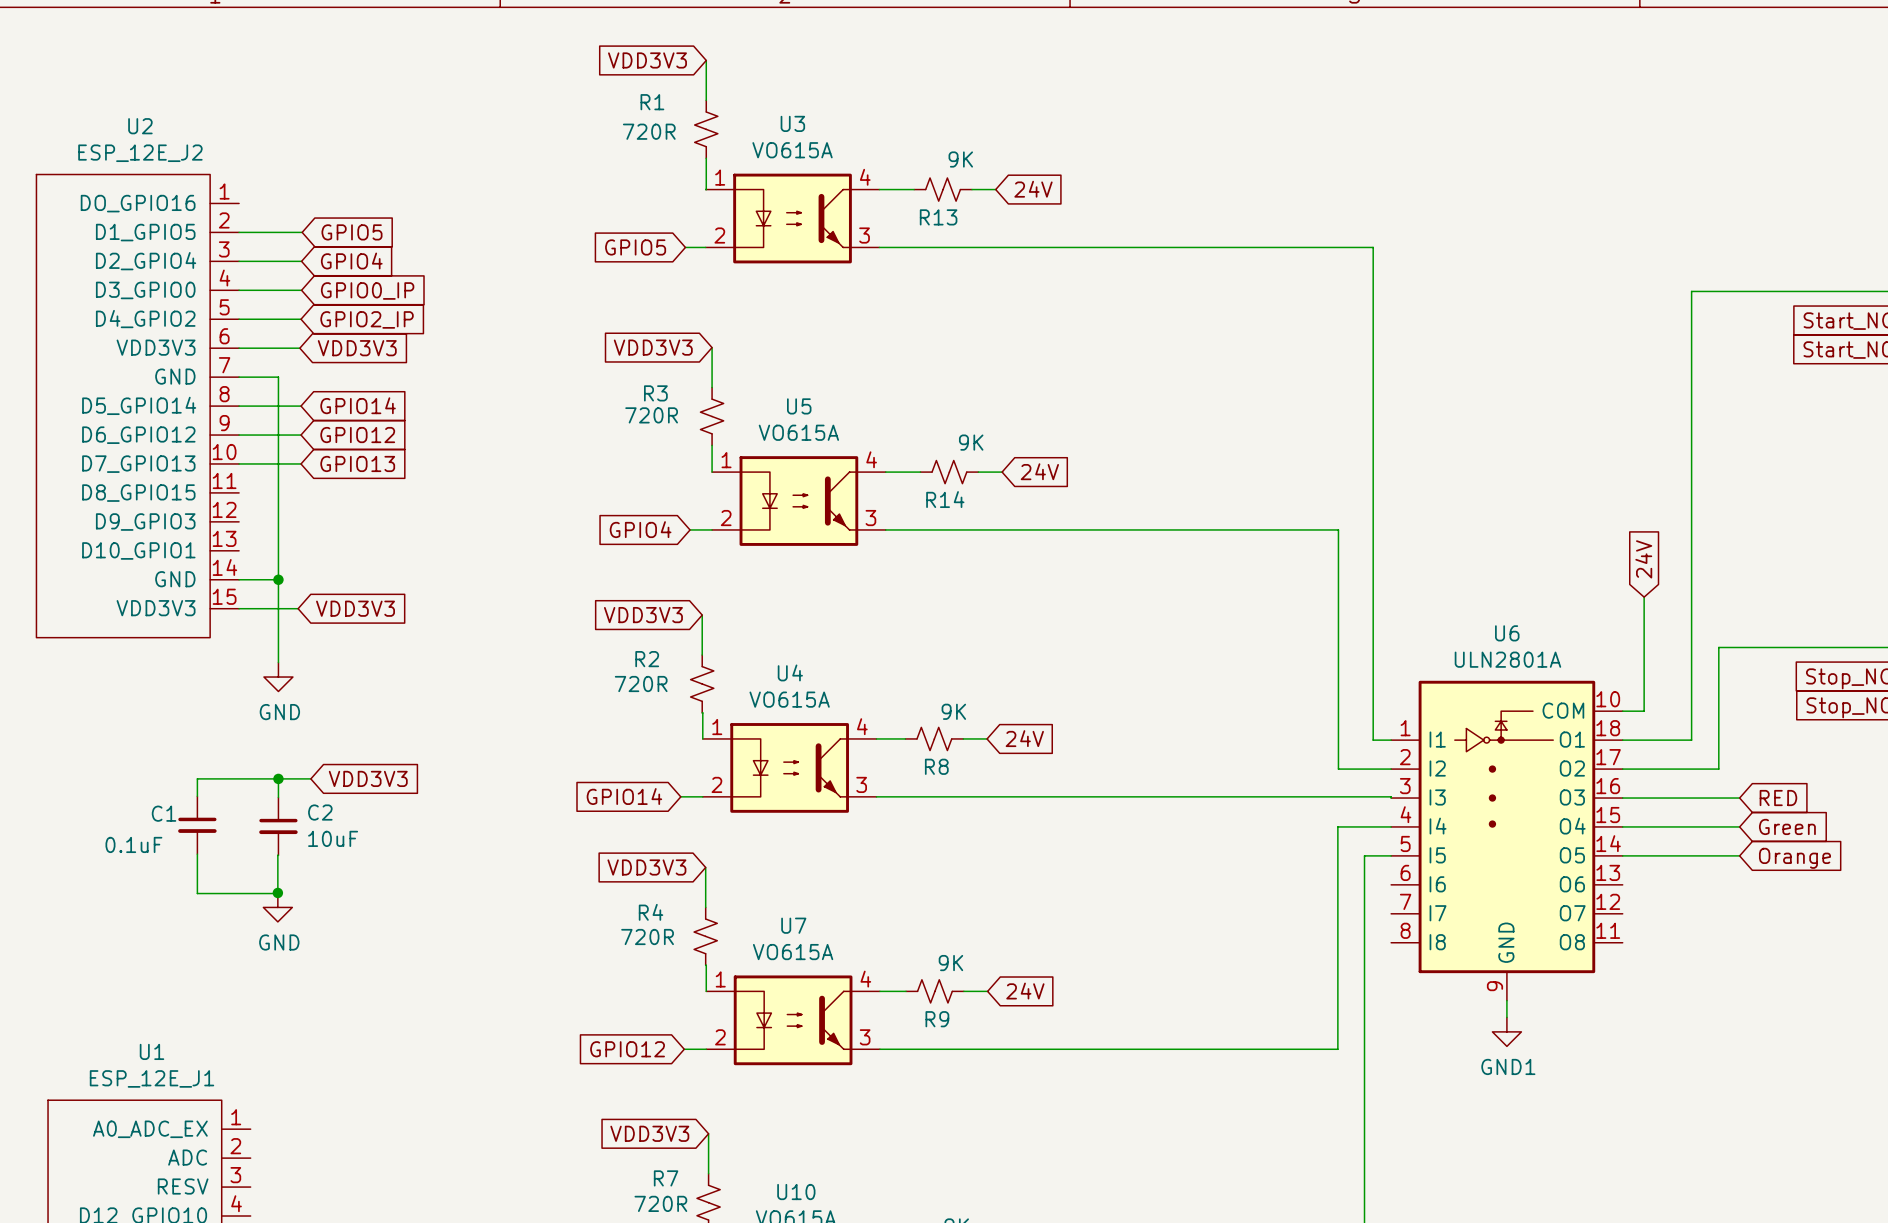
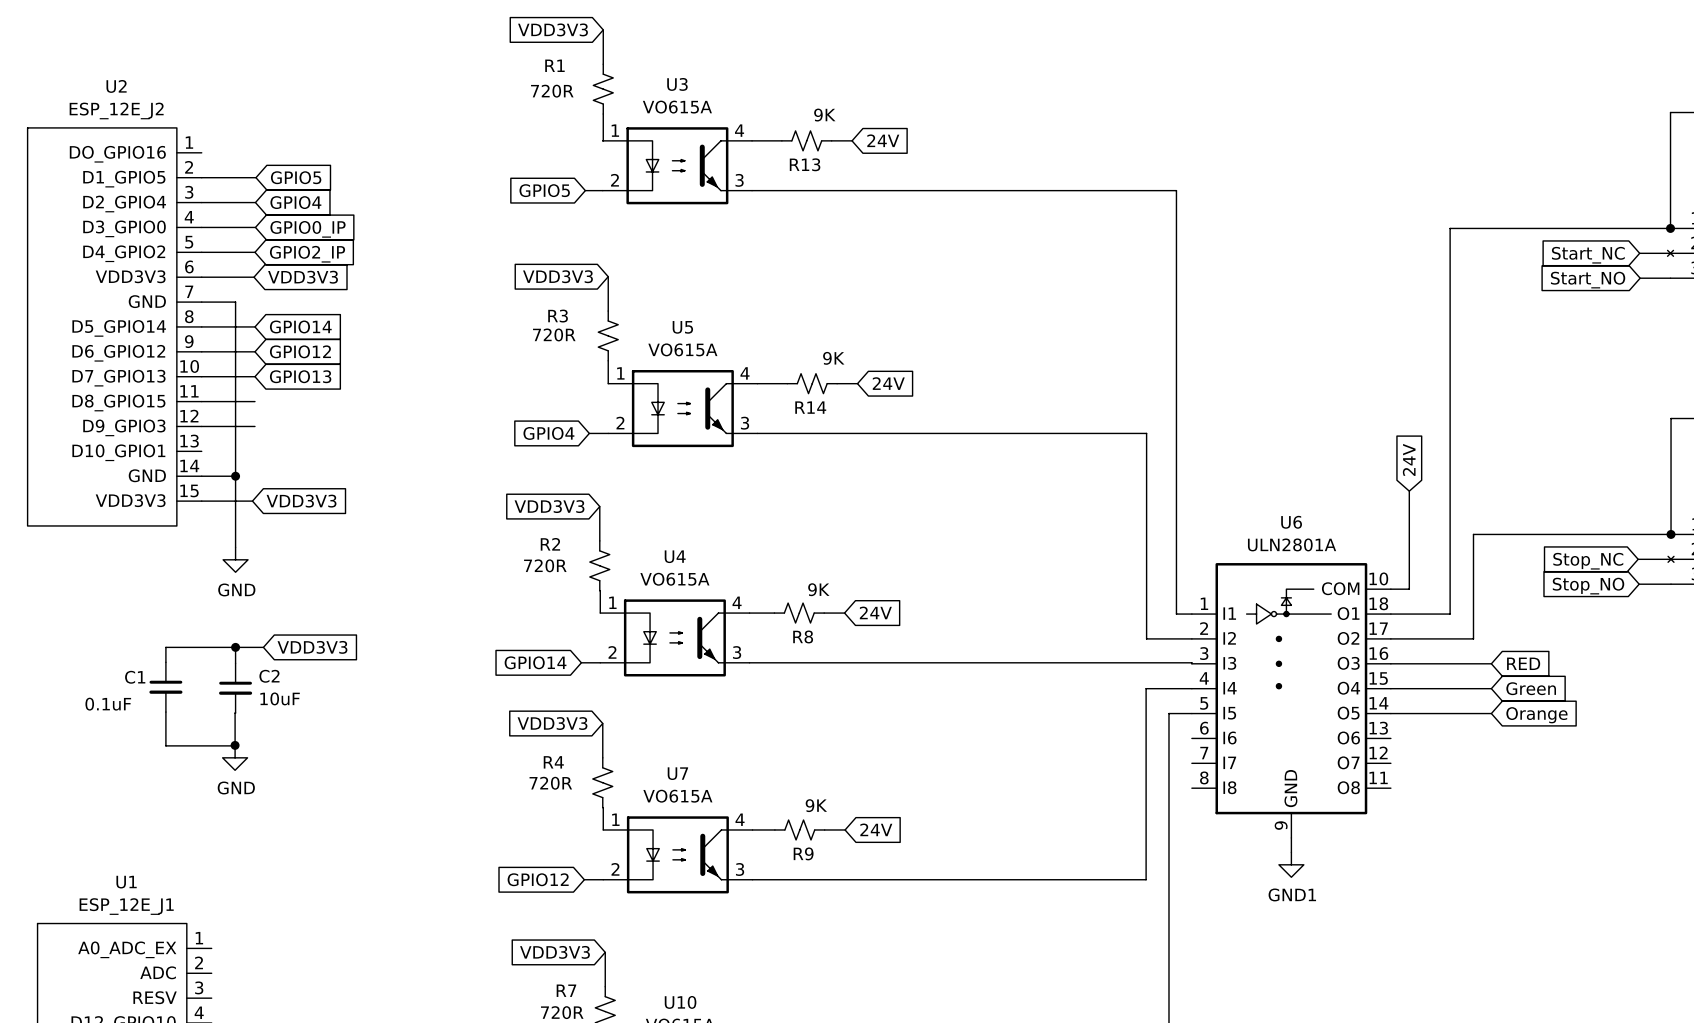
wire: none -> (201, 401) (254, 401)
wire: none -> (201, 426) (254, 426)

